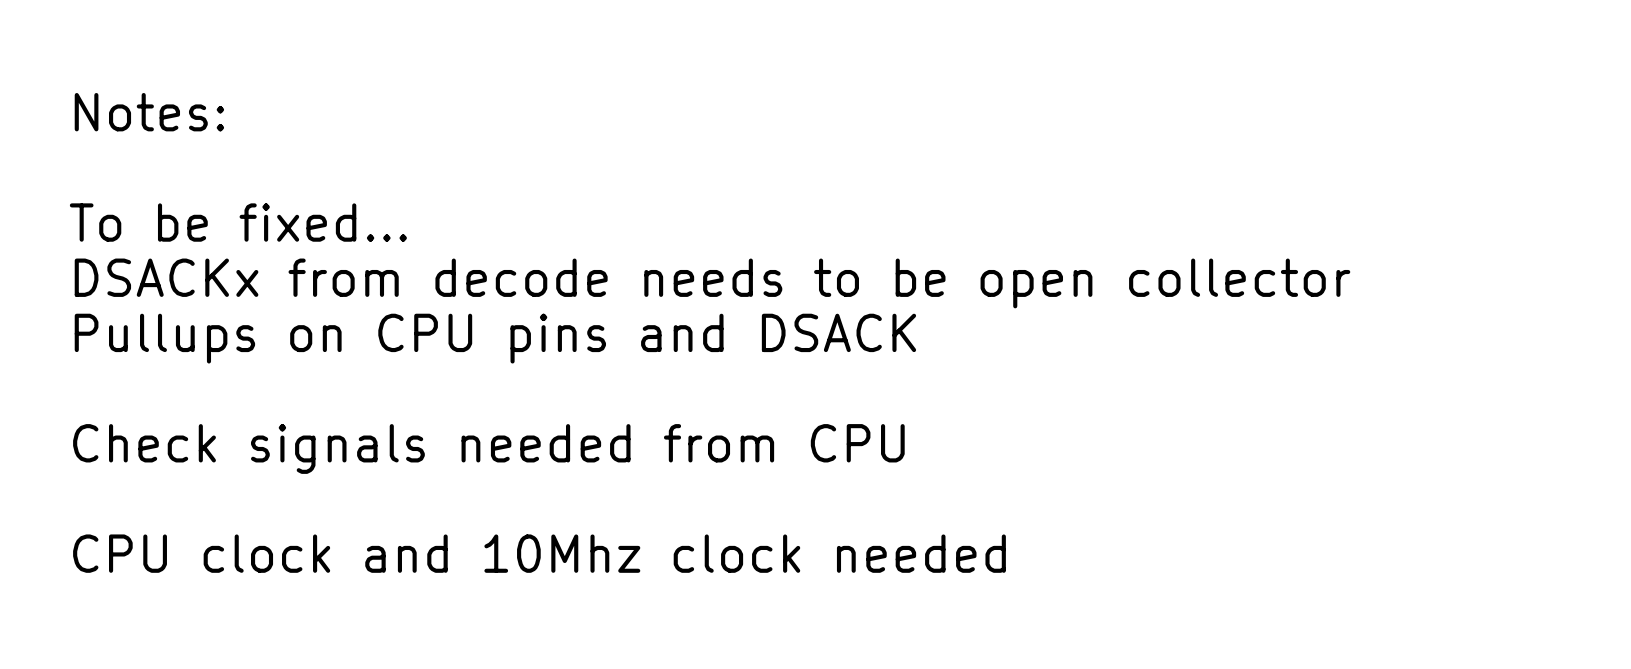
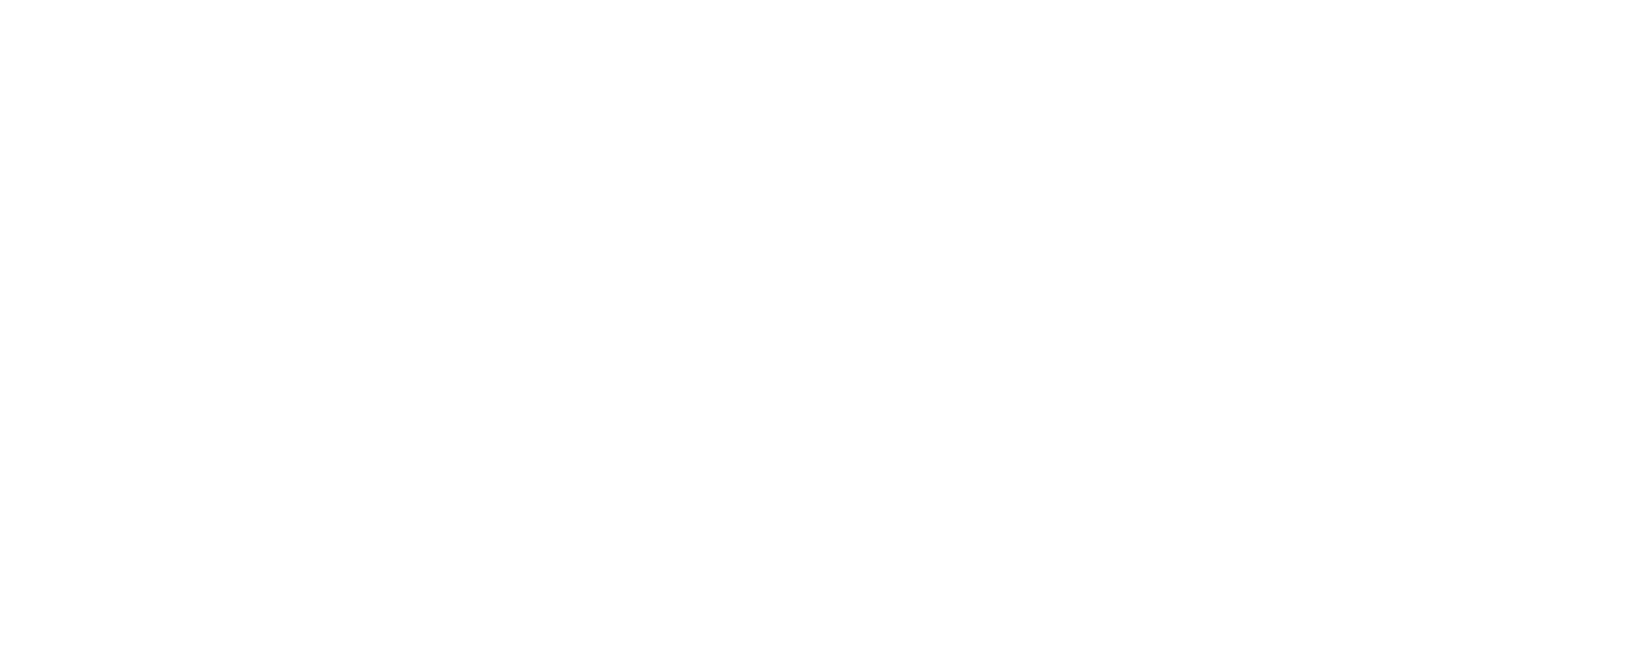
text: Notes: (149, 112) -> none
text: To be fixed... (238, 222) -> none
text: DSACKx from decode needs to be open collector (712, 283) -> none
text: Pullups on CPU pins and DSACK (495, 338) -> none
text: Check signals needed from CPU (488, 448) -> none
text: CPU clock and 10Mhz clock needed (539, 553) -> none

